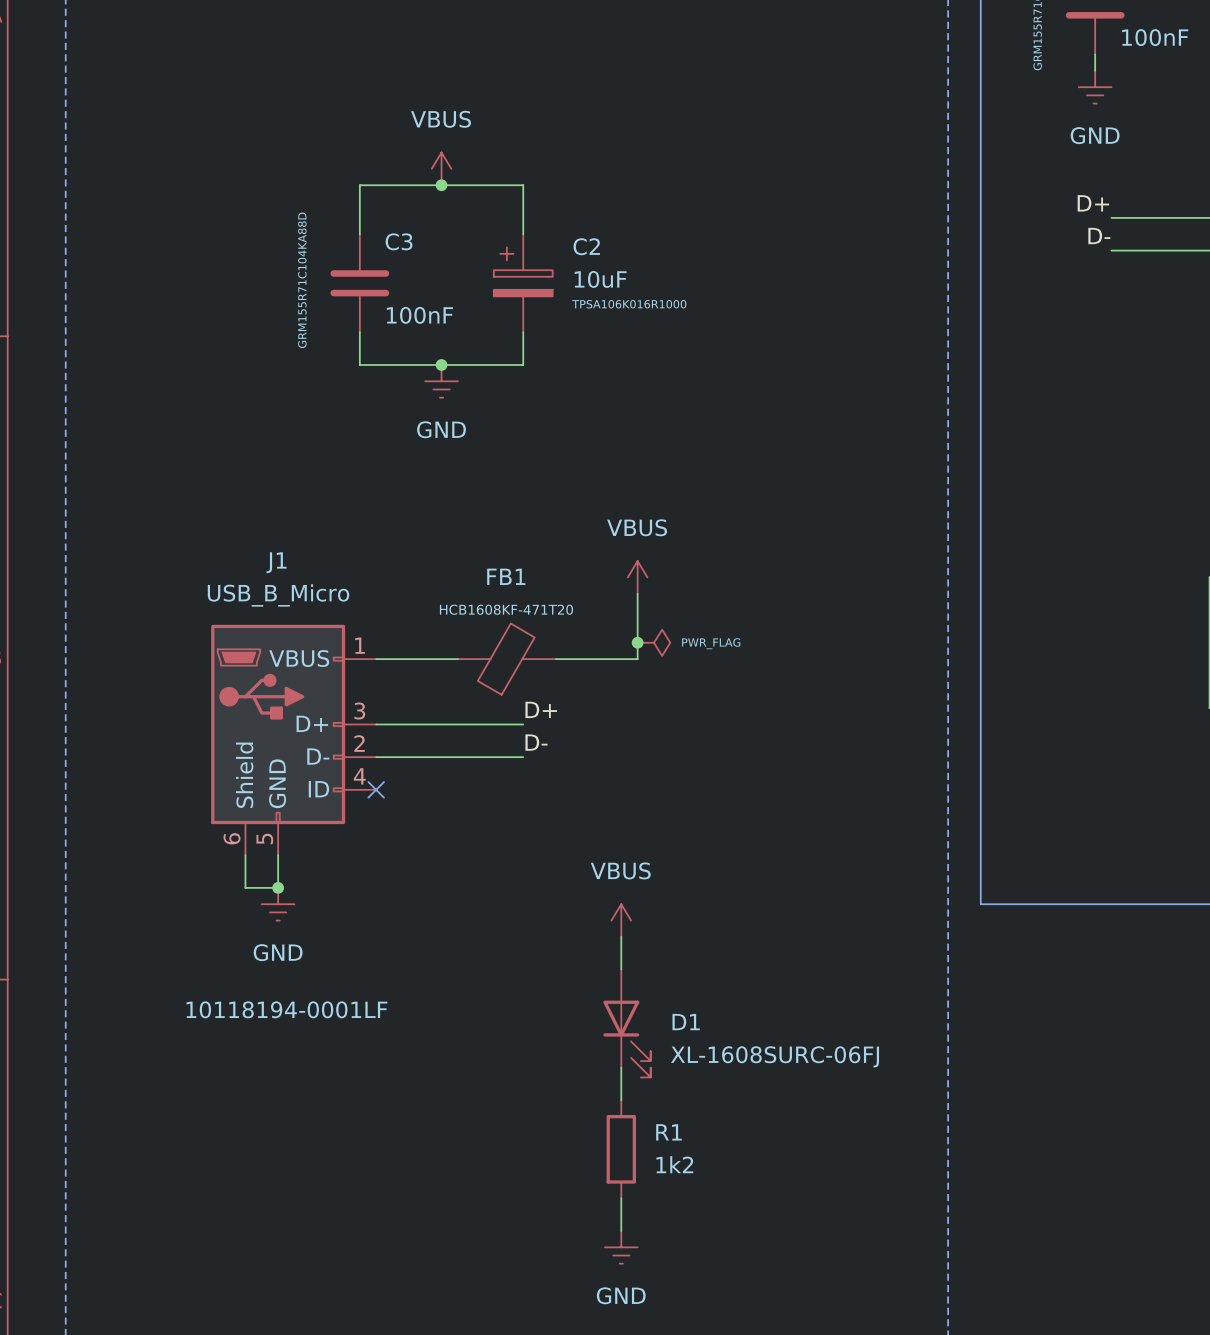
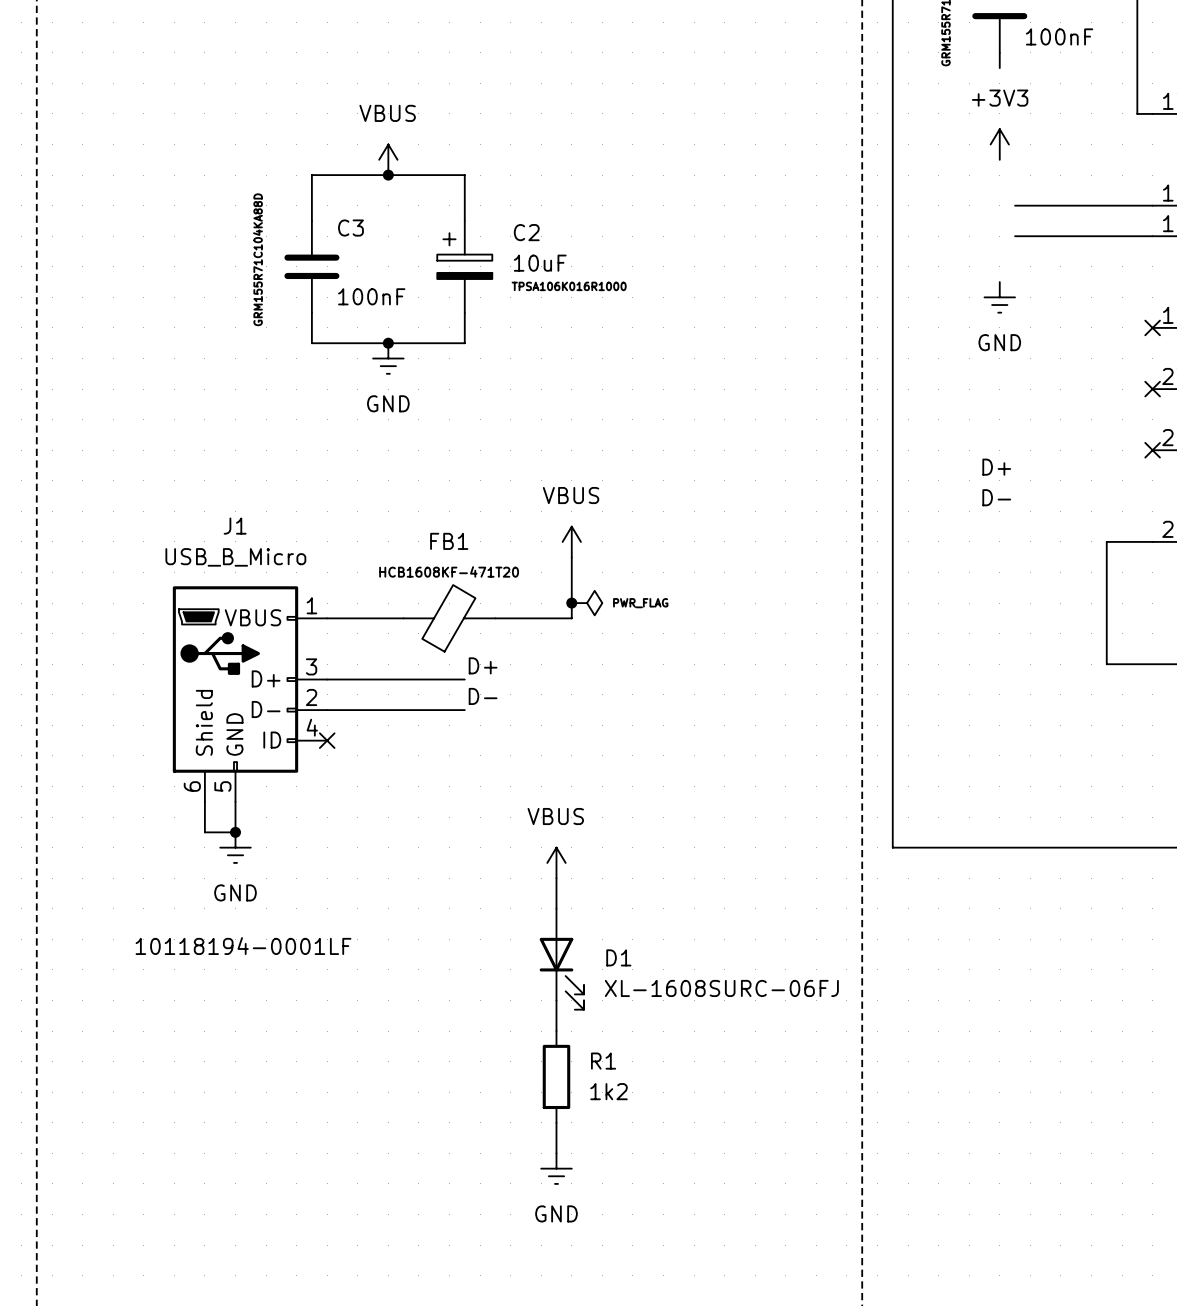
power symbol position: GND (1095, 87) -> GND (999, 297)
power symbol: none -> +3V3 (999, 144)
label position: D+ (1093, 203) -> D+ (996, 467)
label position: D- (1099, 236) -> D- (996, 497)

